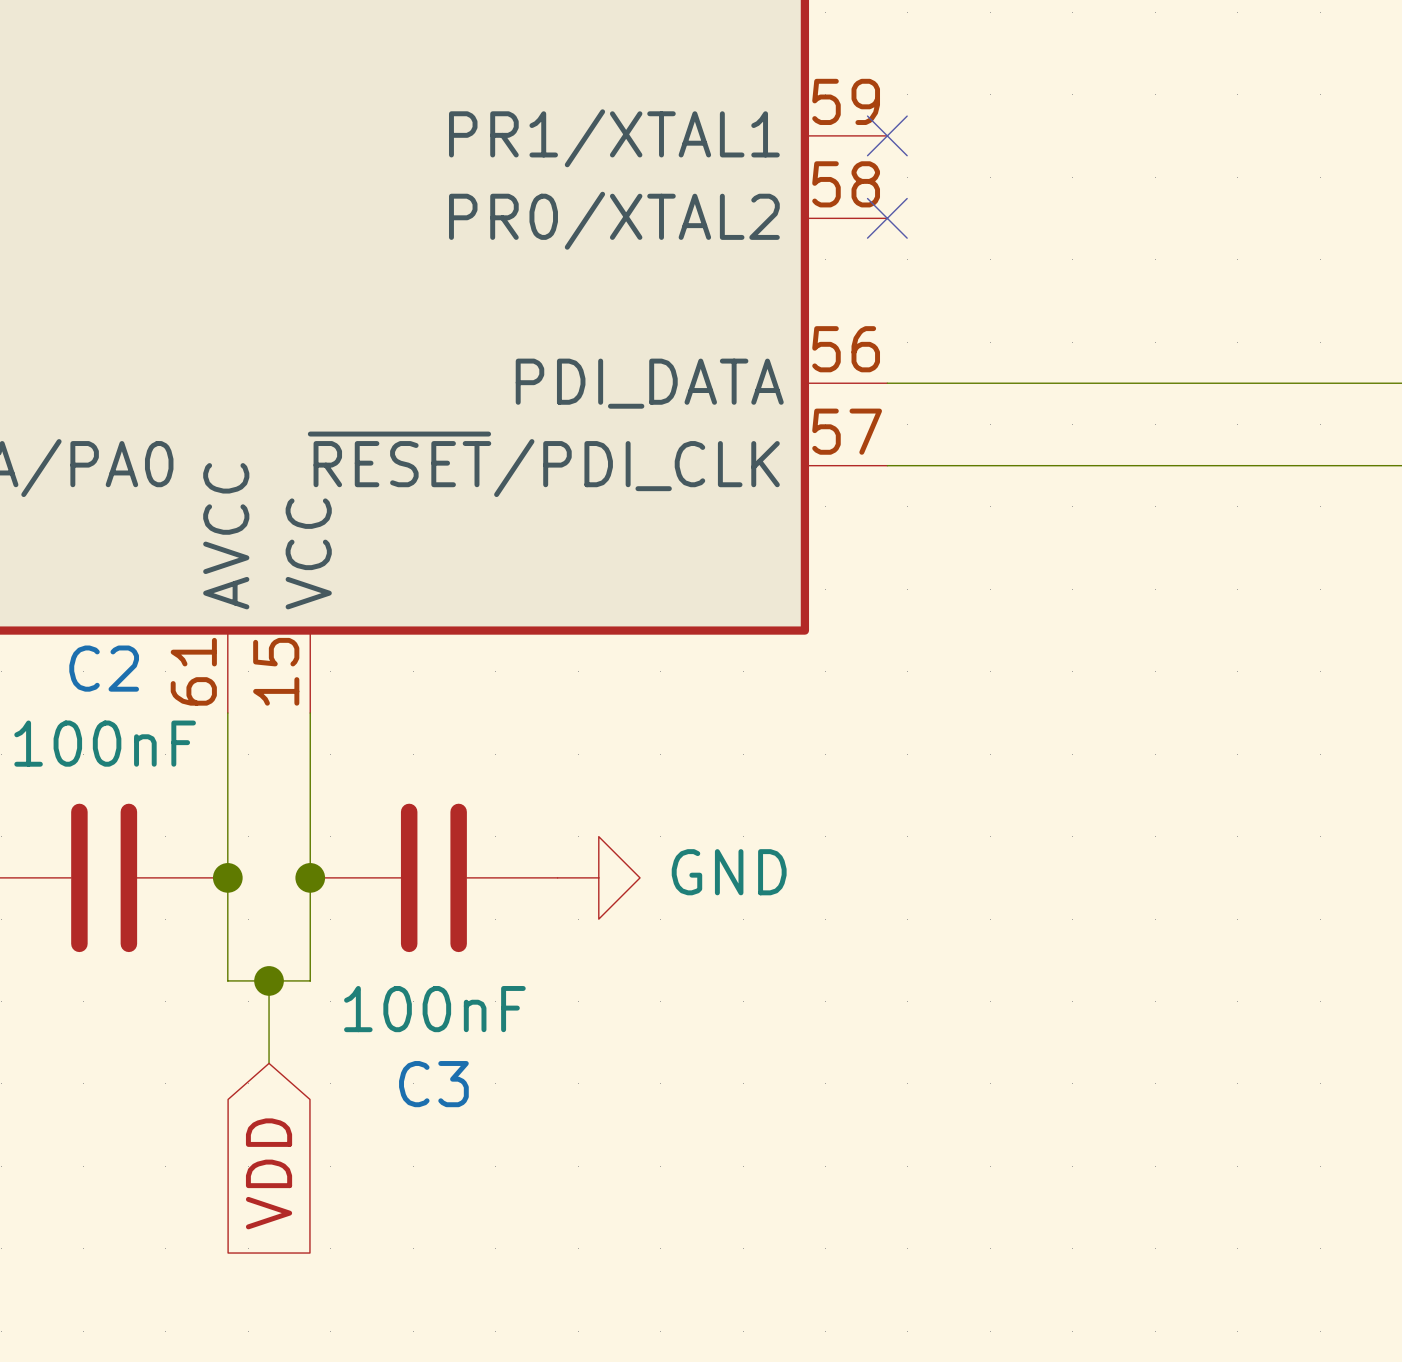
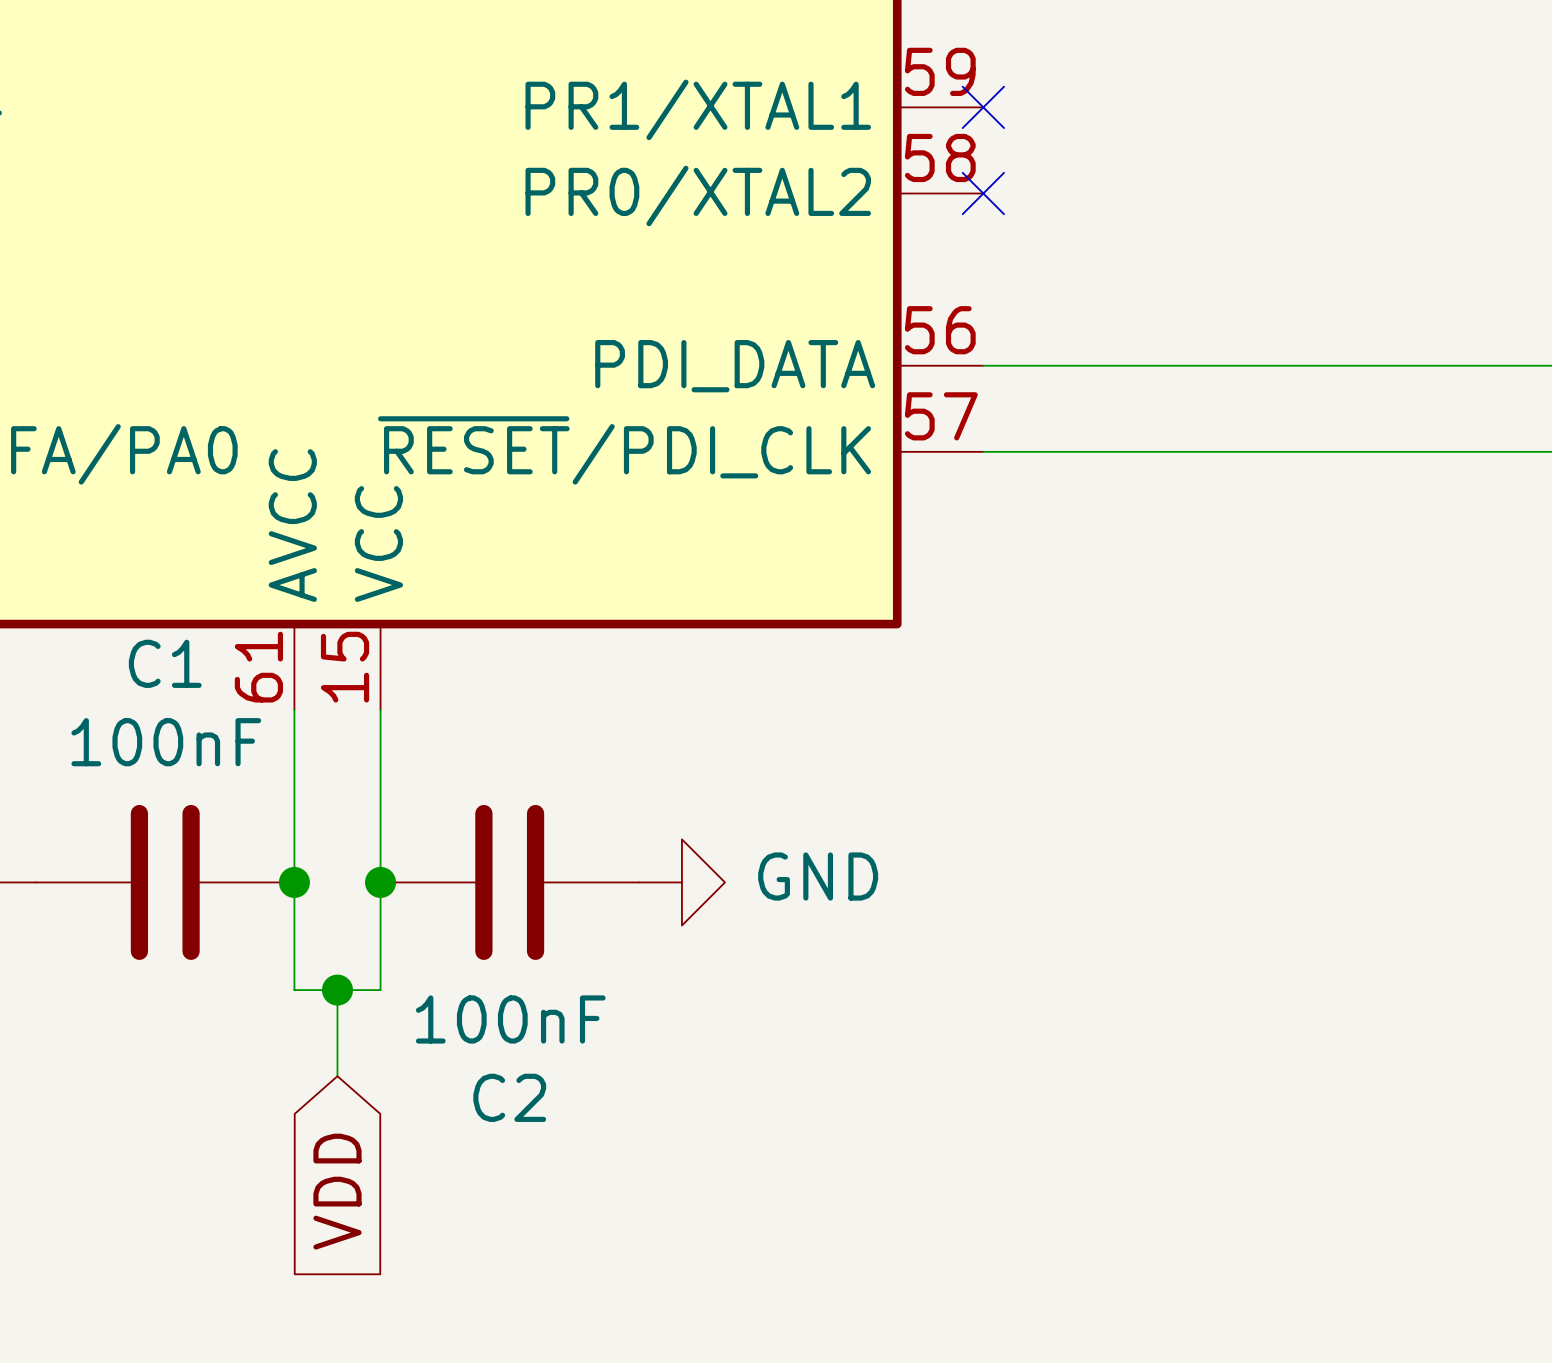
C2 name: C2 (104, 668) -> C1 (165, 663)
C3 name: C3 (433, 1084) -> C2 (509, 1097)

